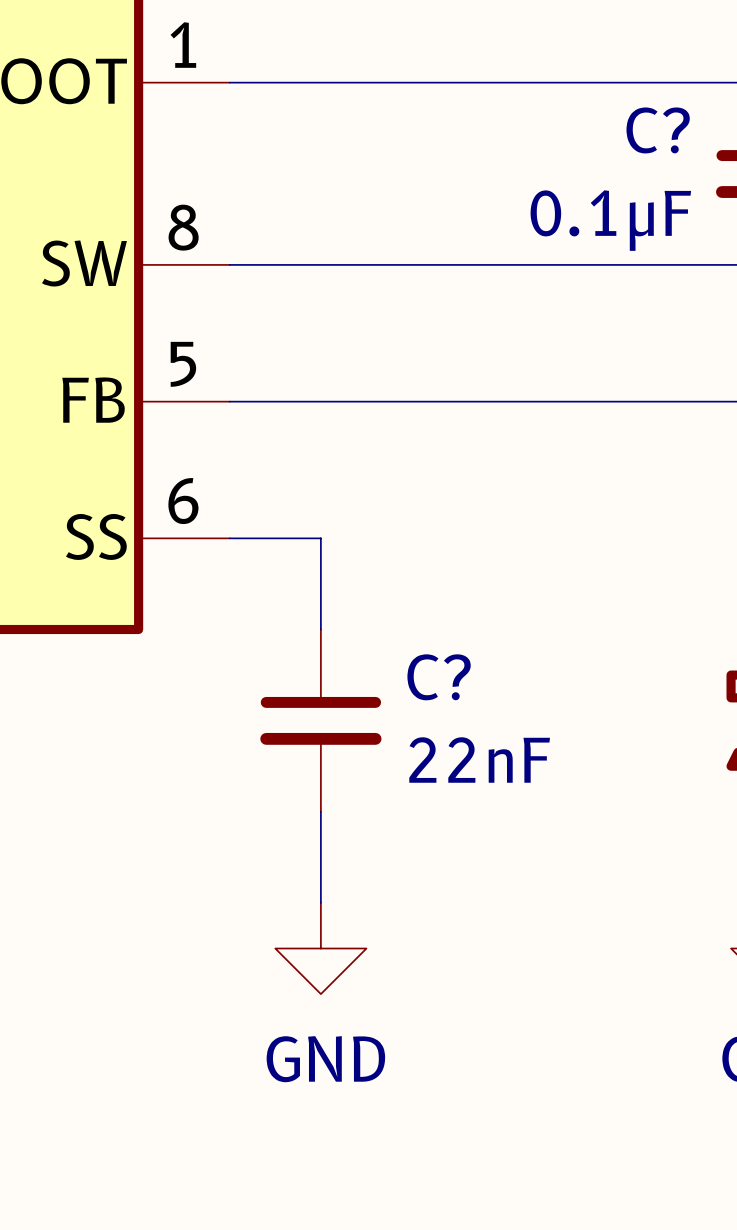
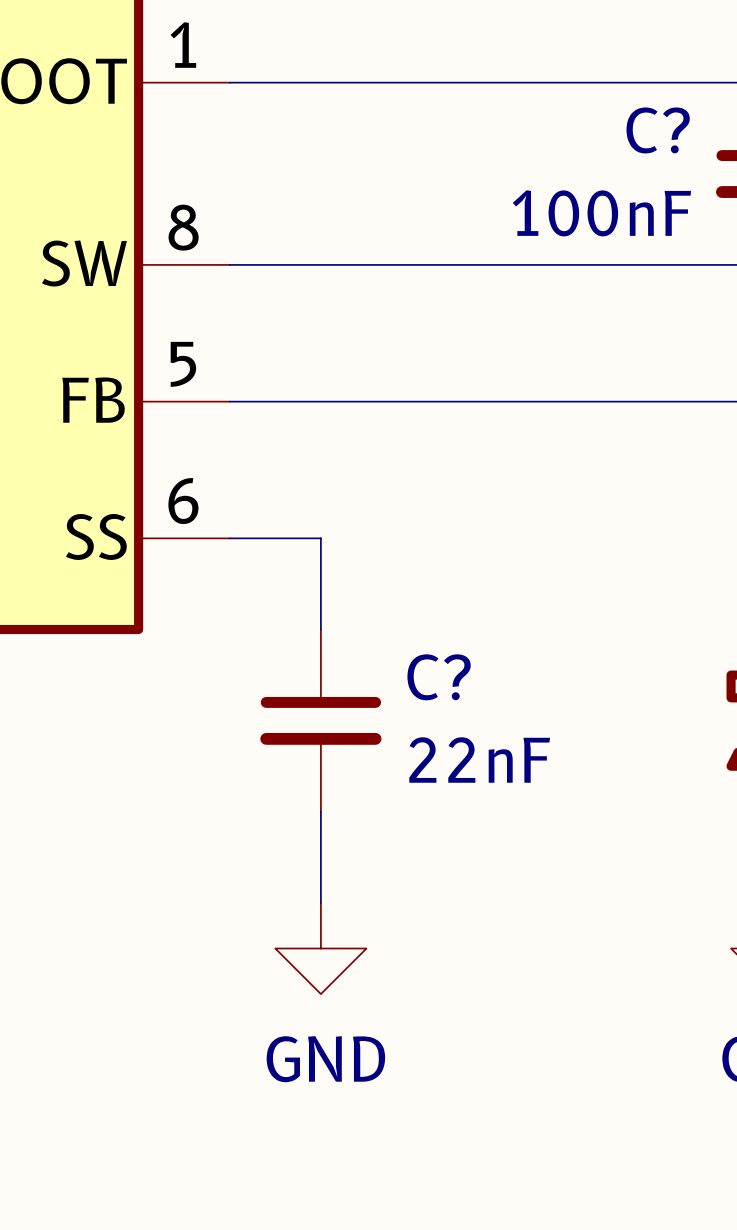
C? value: 0.1μF (610, 220) -> 100nF (601, 213)

